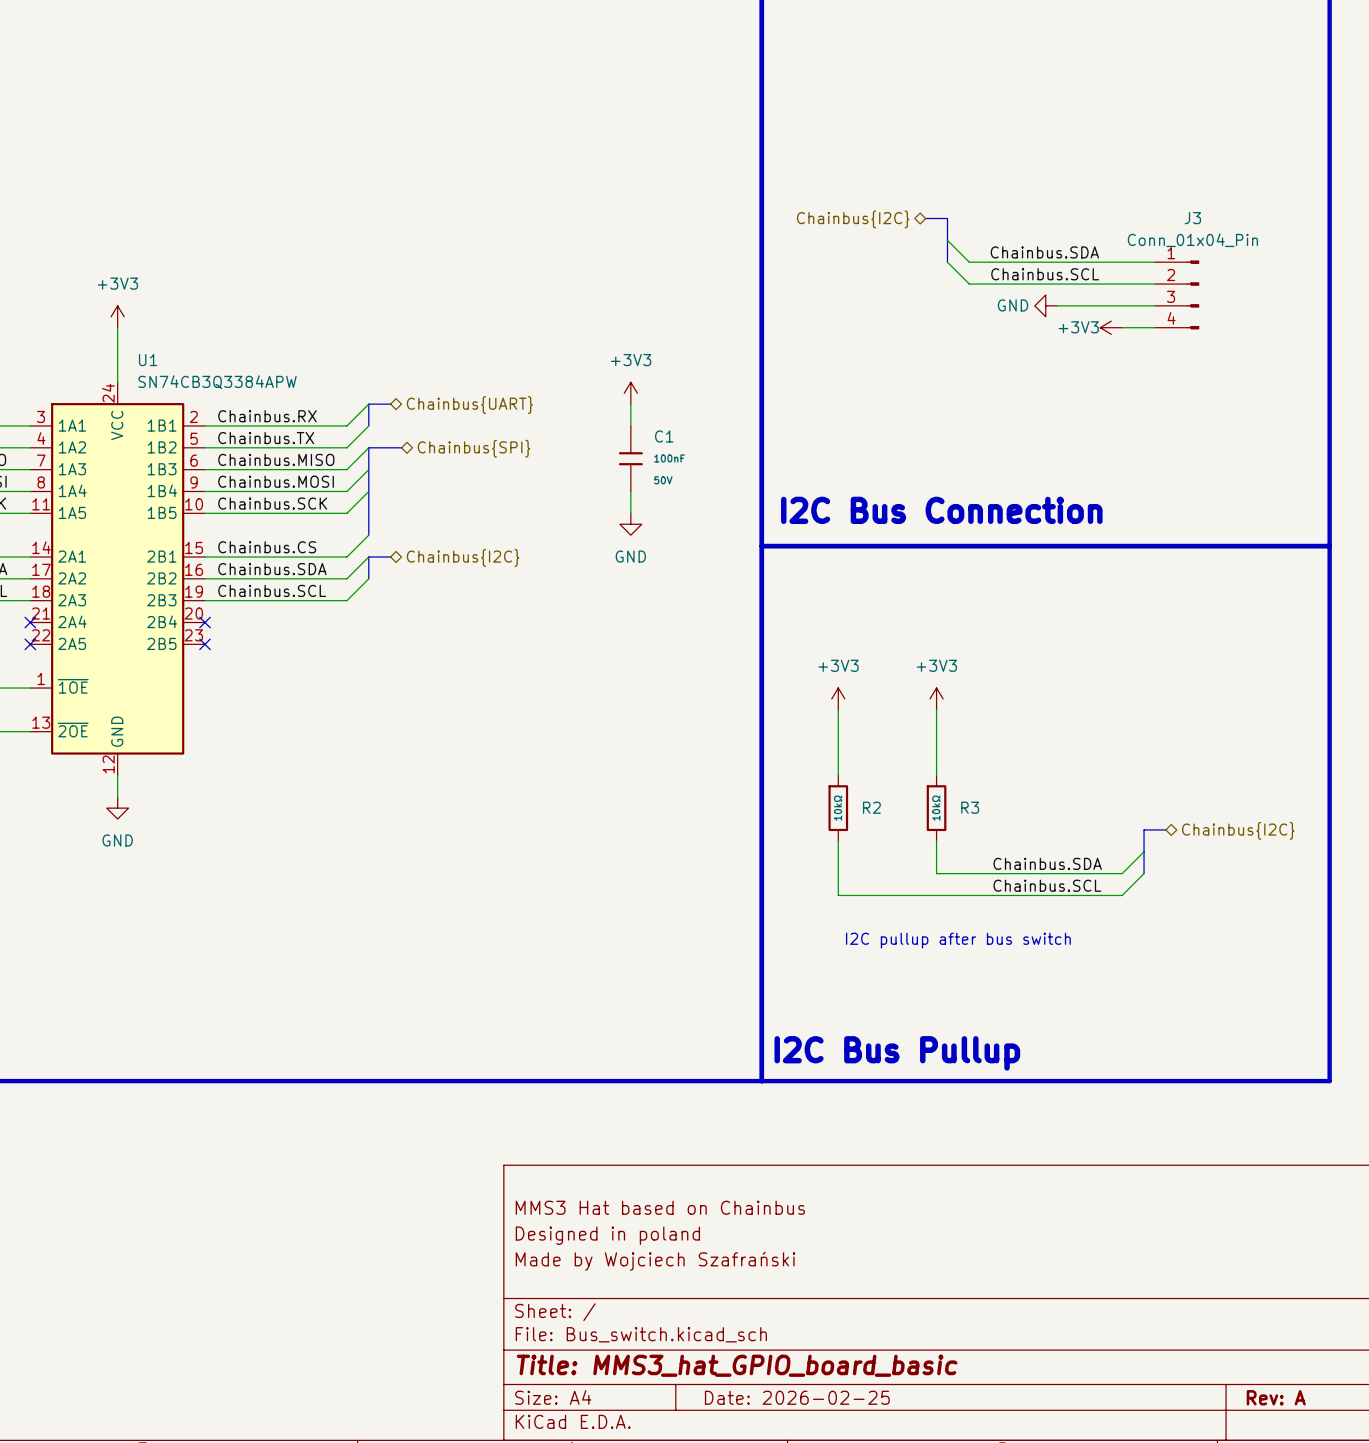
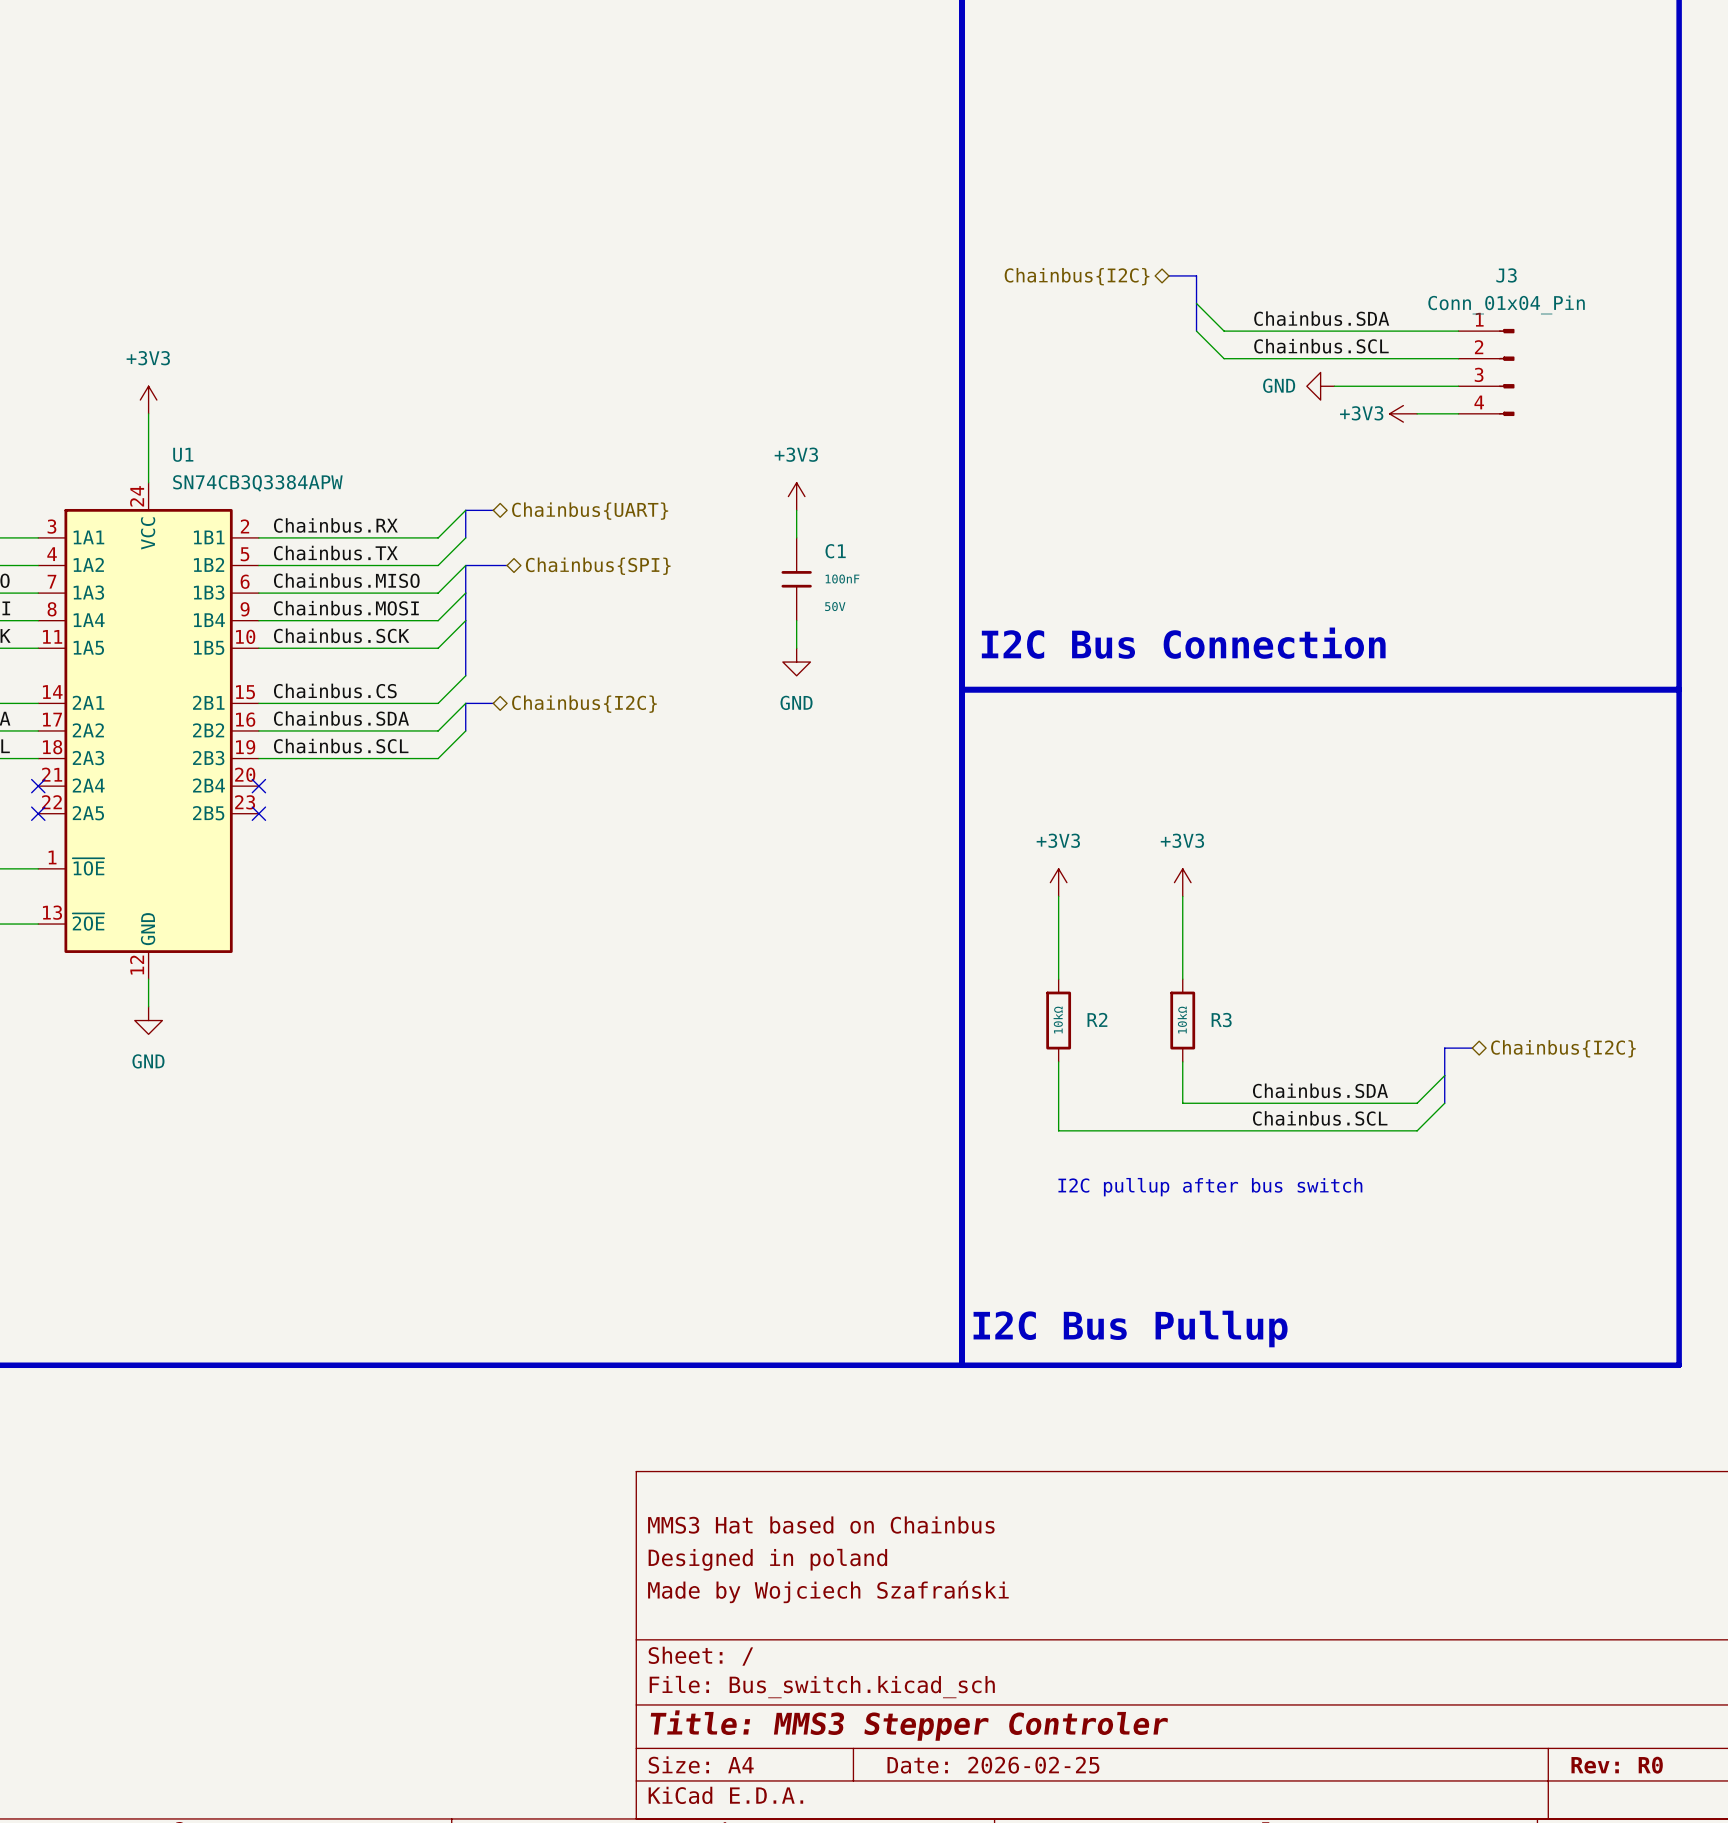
title block: Title: MMS3_hat_GPIO_board_basic (737, 1365) -> Title: MMS3 Stepper Controler (909, 1725)
title block: Rev: A (1276, 1397) -> Rev: R0 (1617, 1765)

